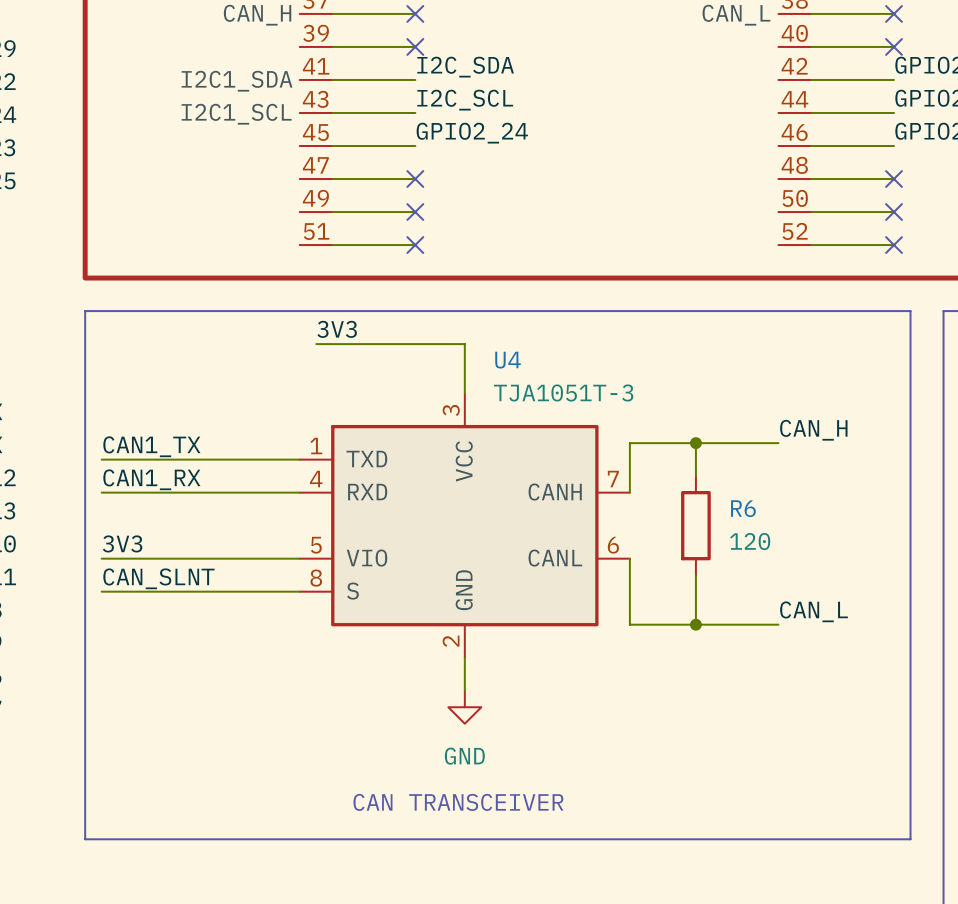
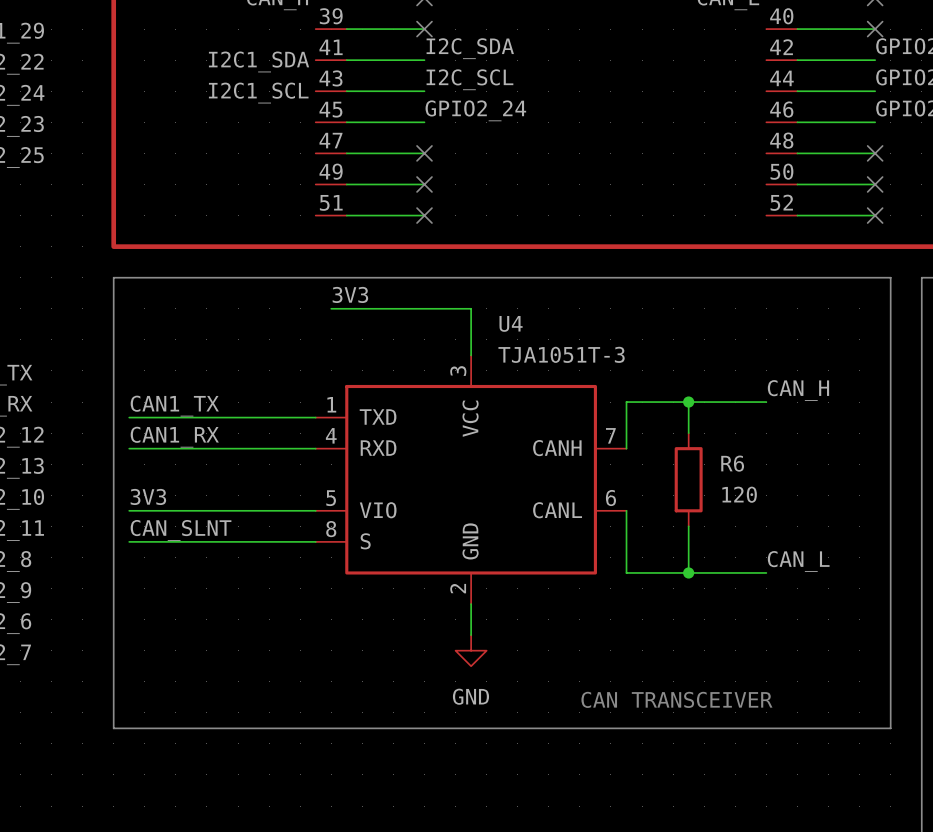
line: (85, 789) (85, 839) (910, 839) (910, 789) -> (113, 728) (890, 728)
text position: CAN TRANSCEIVER (458, 802) -> CAN TRANSCEIVER (676, 699)

